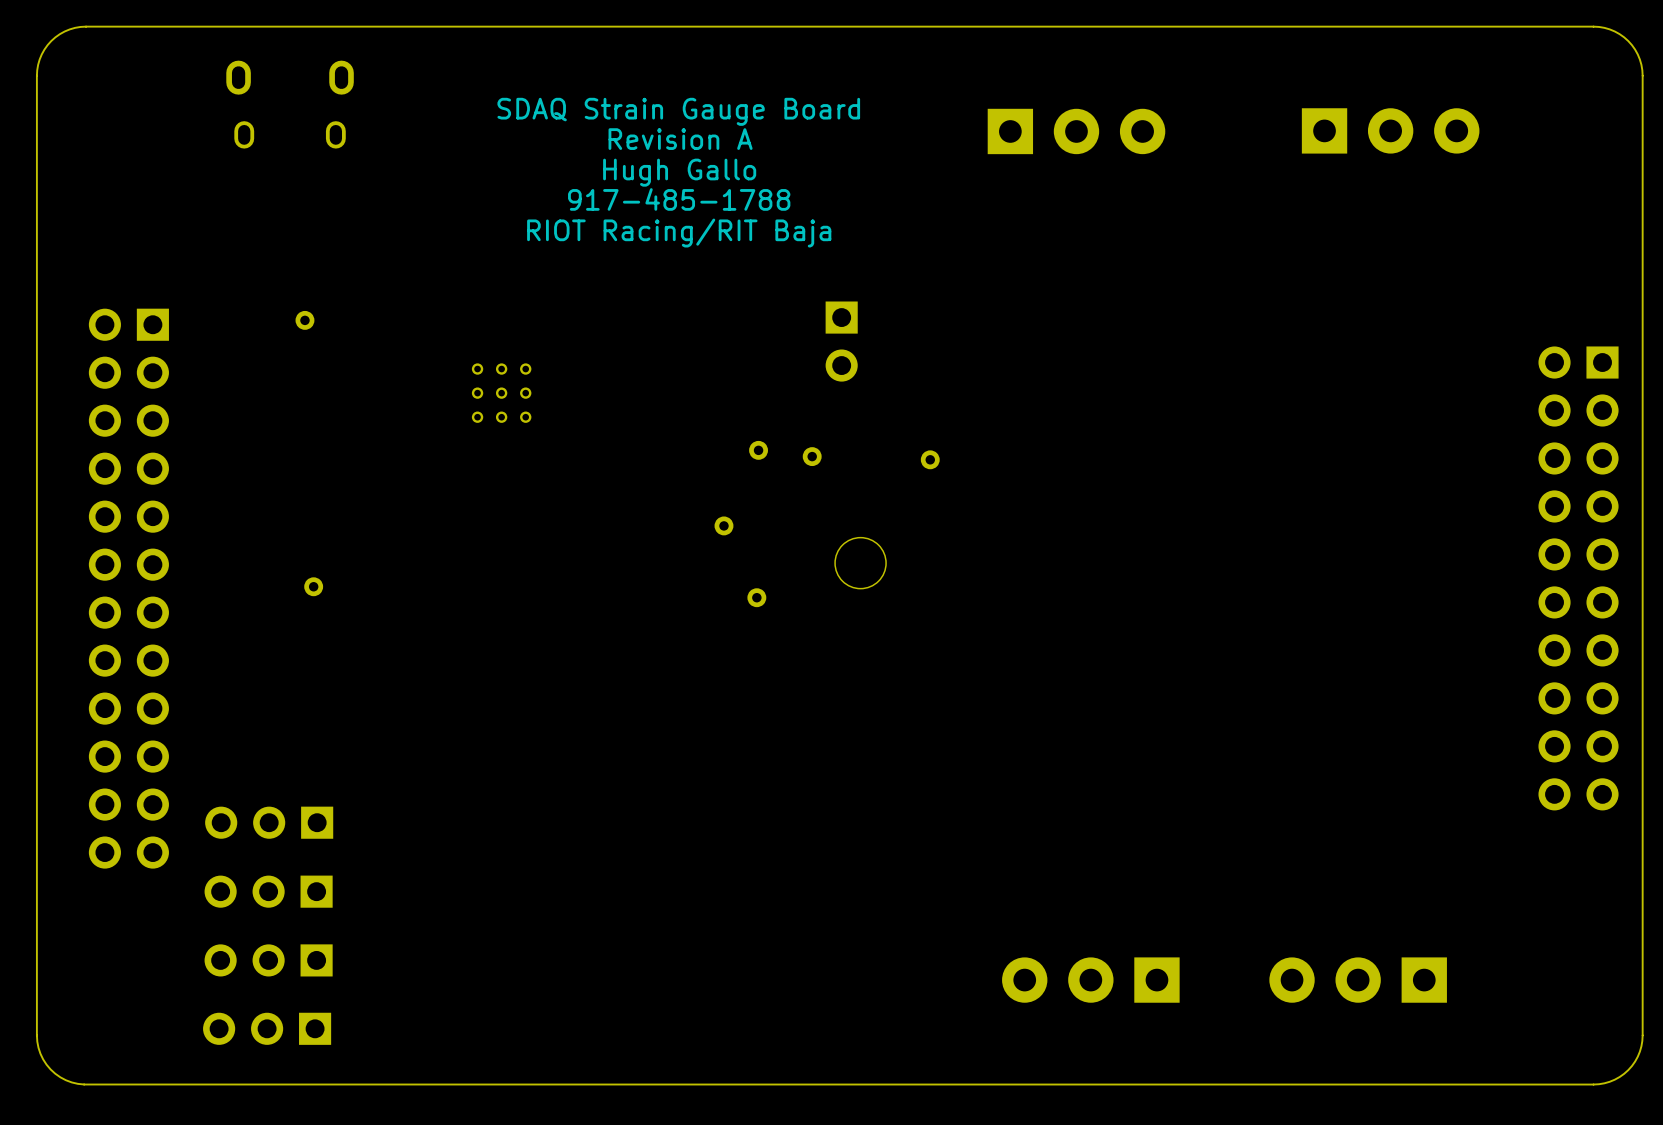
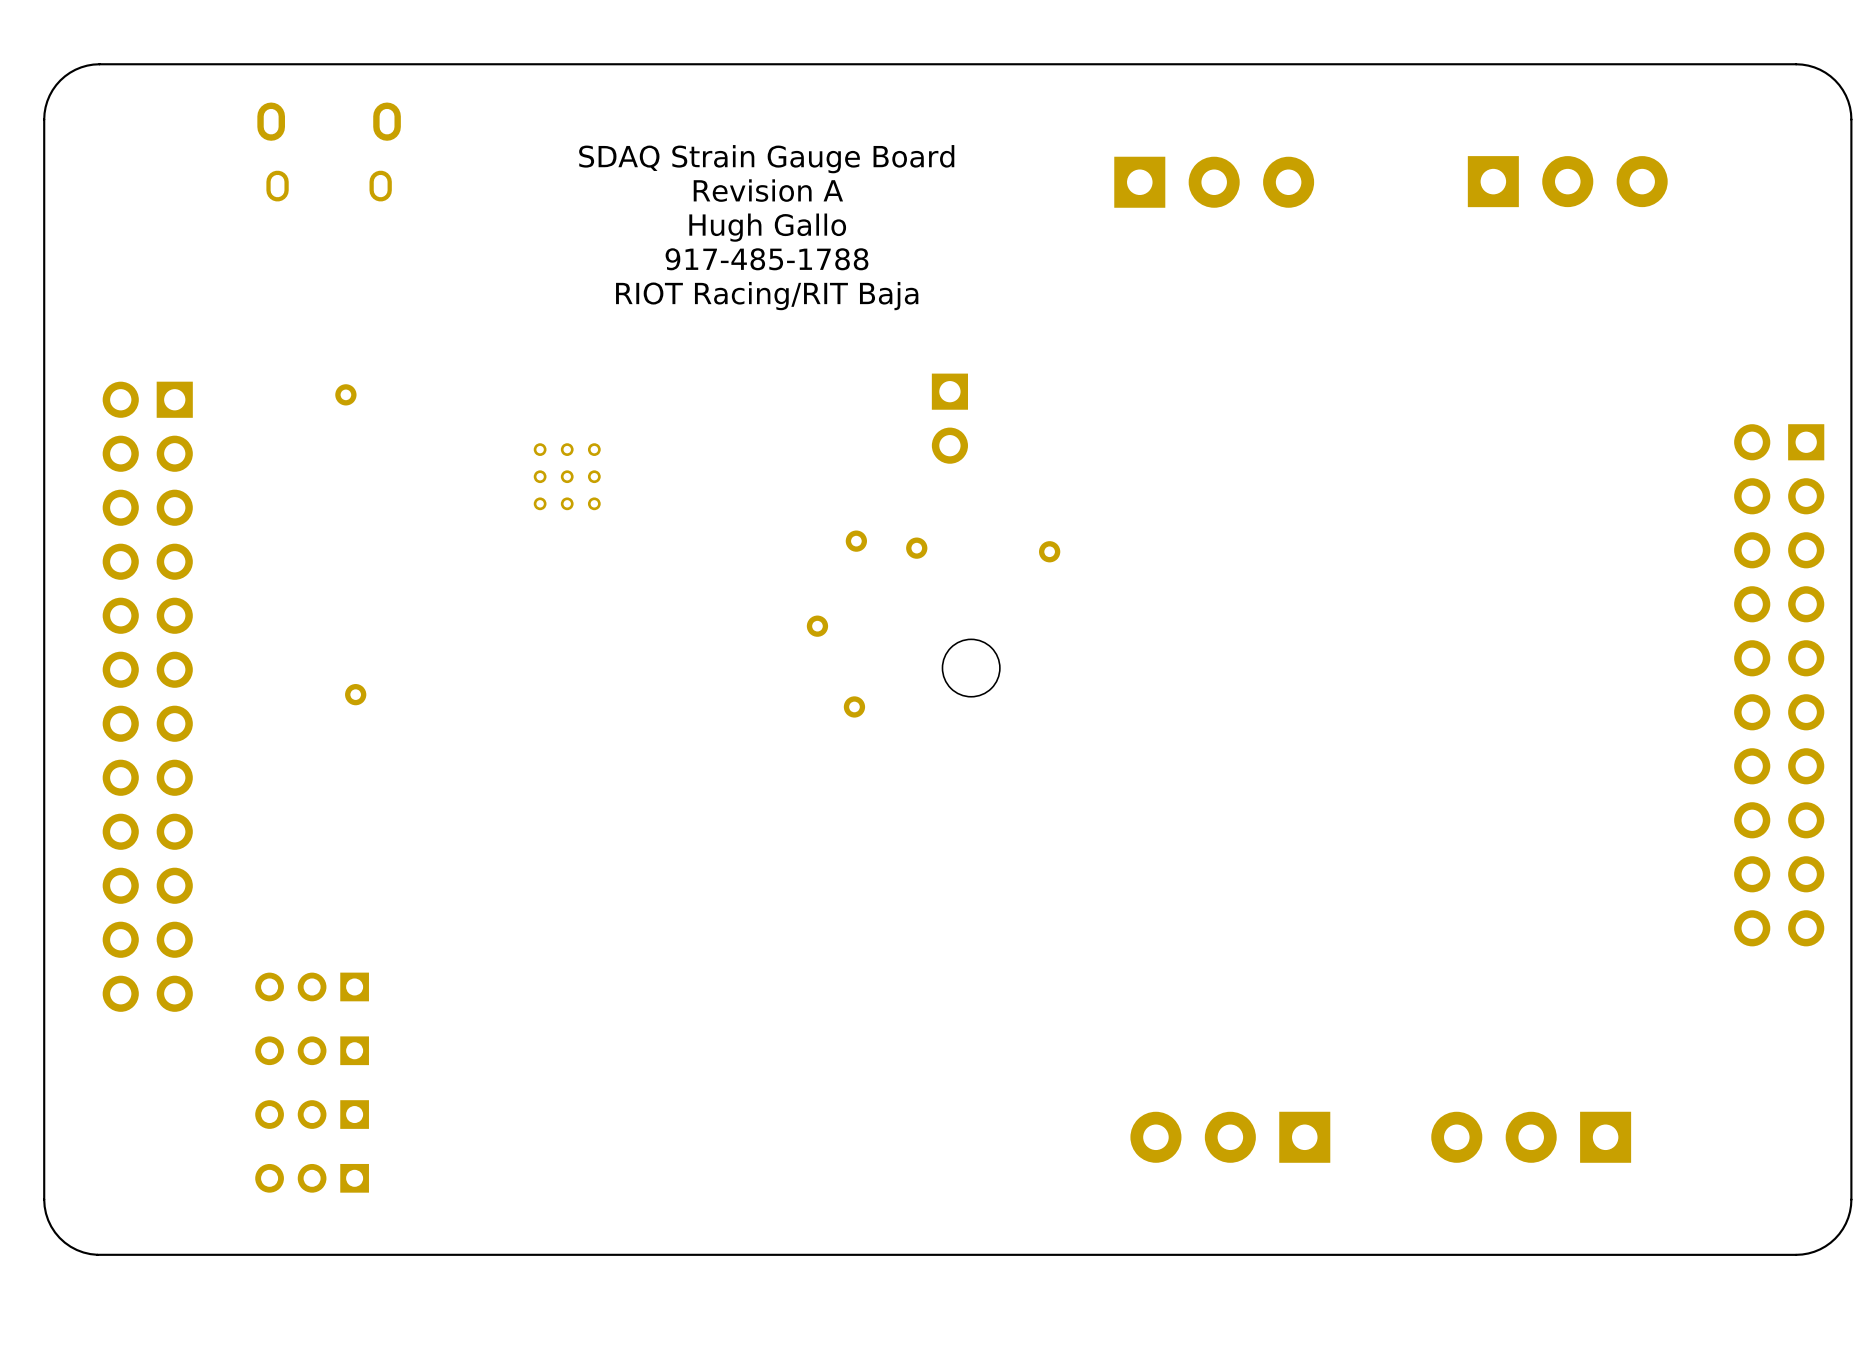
part: (269, 822) -> none
part: none -> (312, 986)
part footprint: [204, 875, 333, 908] -> [255, 1036, 369, 1066]
part footprint: [204, 944, 333, 977] -> [255, 1100, 369, 1129]
part footprint: [203, 1012, 332, 1045] -> [255, 1163, 369, 1193]

